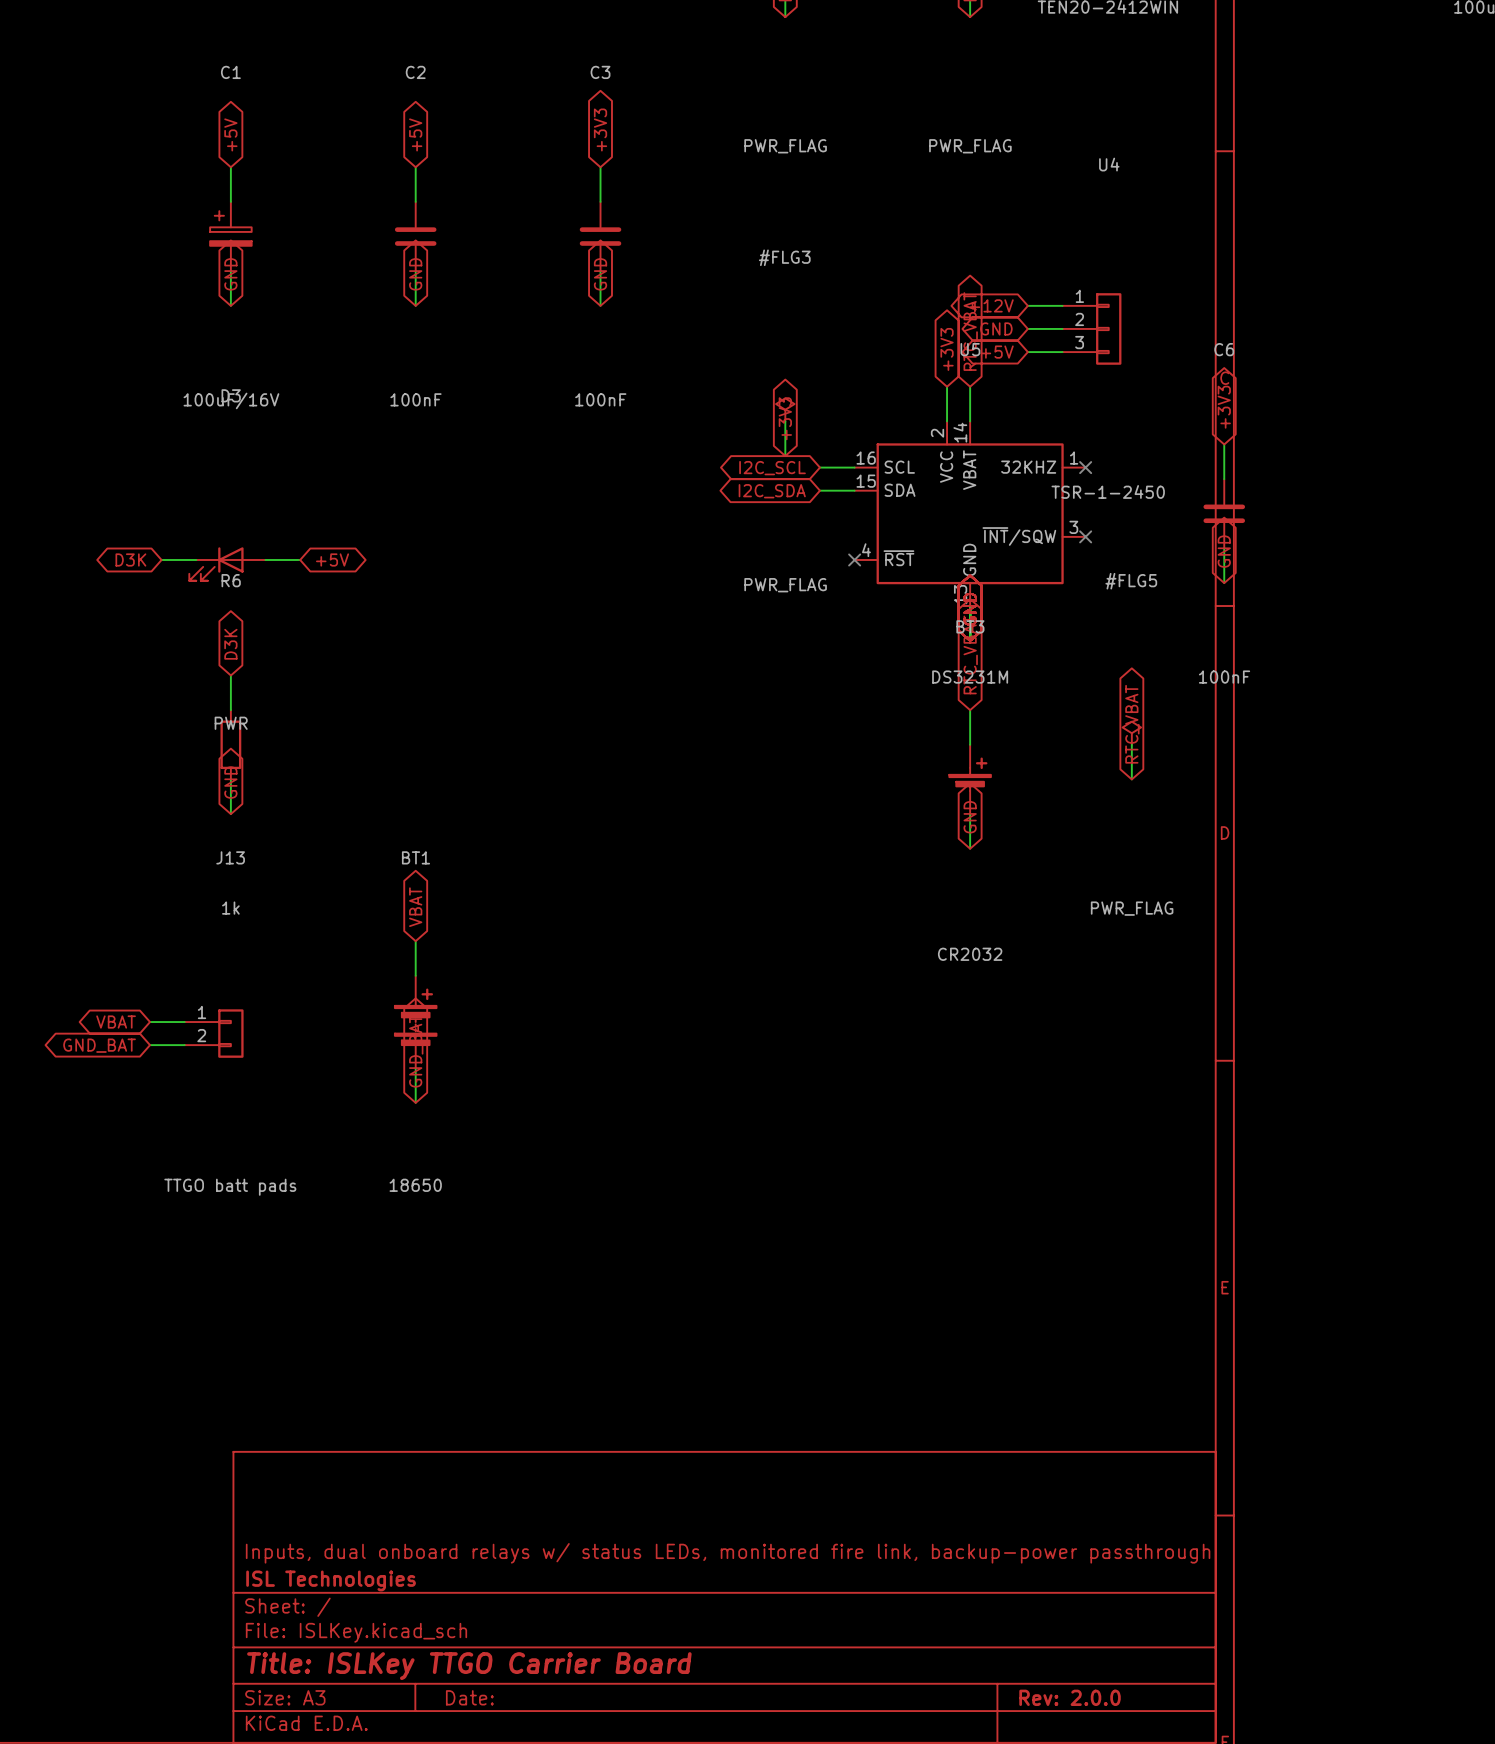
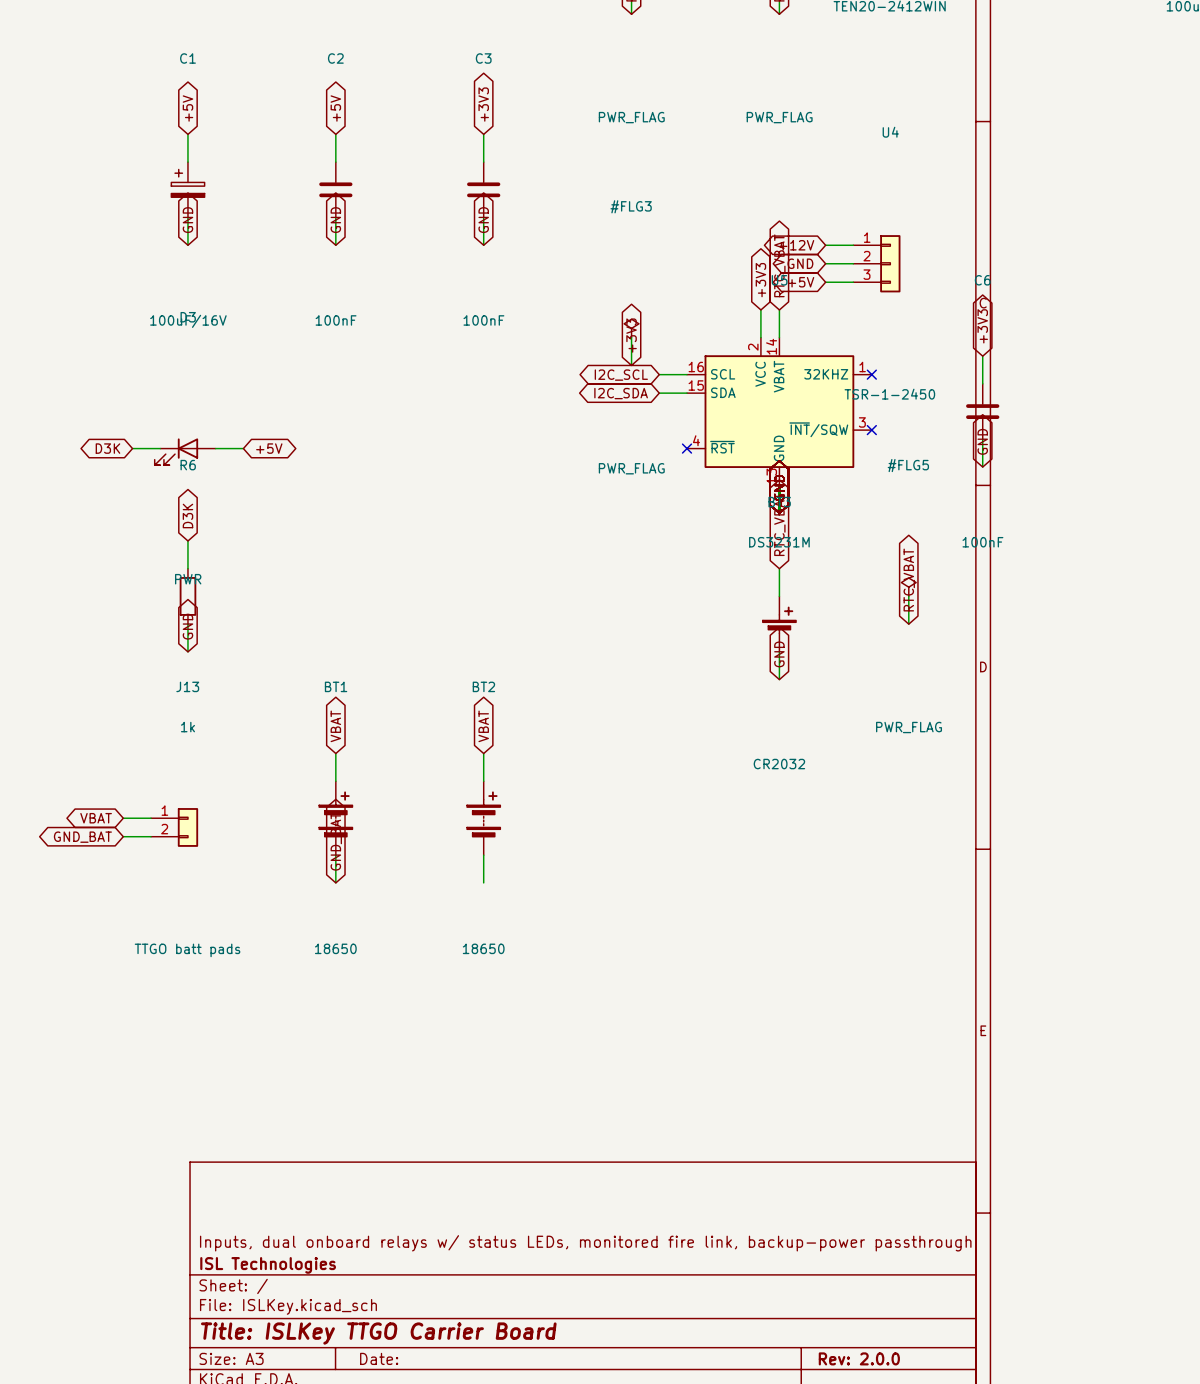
global label: none -> VBAT (483, 726)
wire: none -> (483, 753) (483, 781)
BT2: none -> 18650 (483, 818)
wire: none -> (483, 855) (483, 882)

